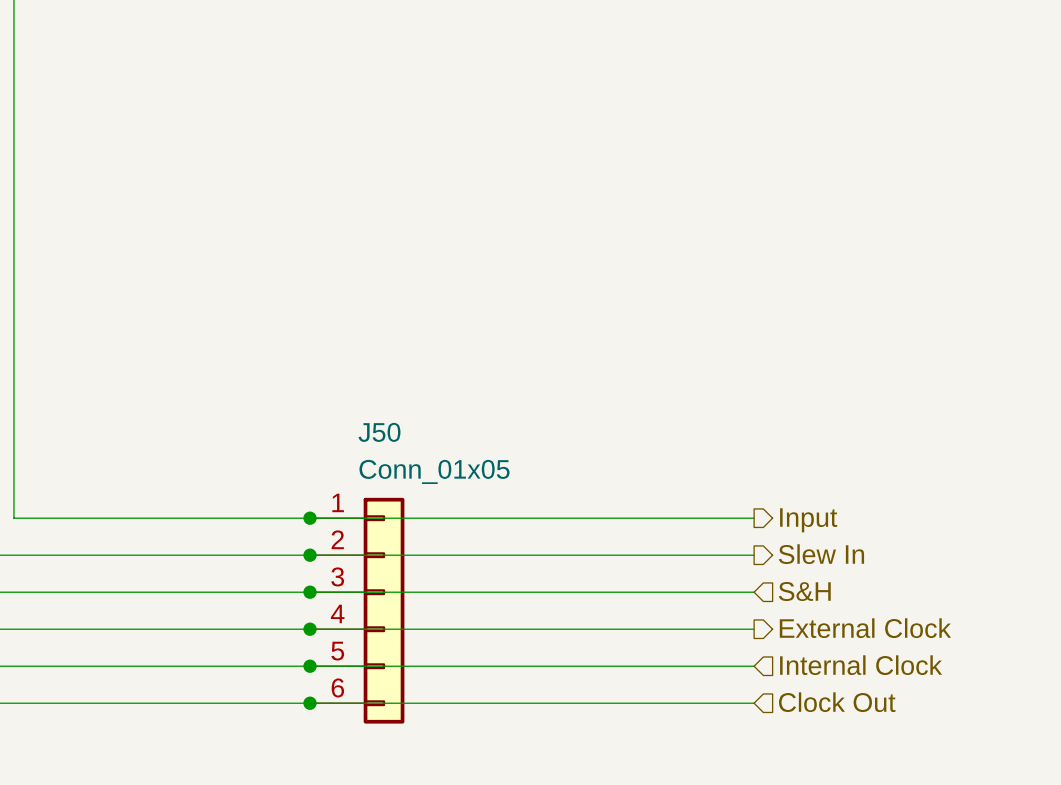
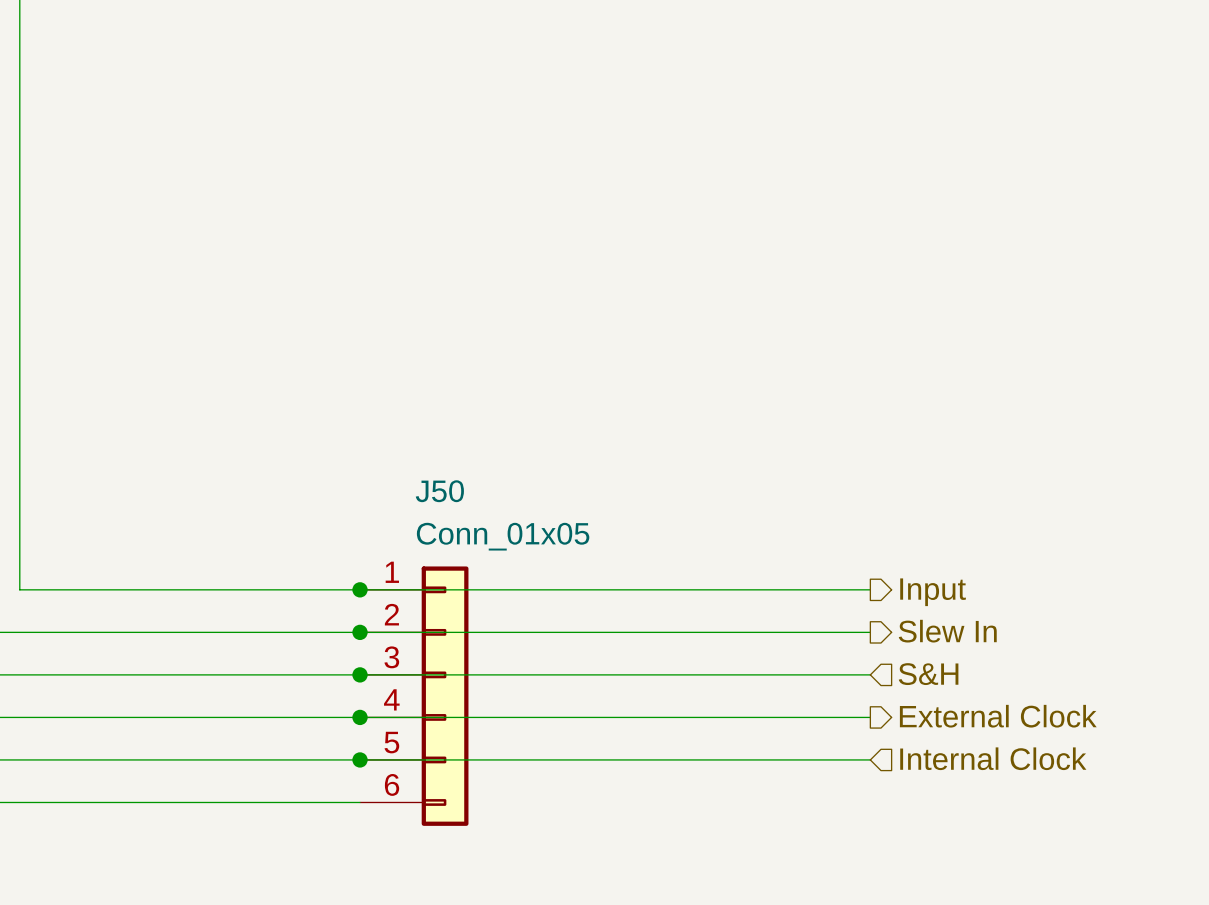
hierarchical label: Clock Out (837, 702) -> none
wire: (310, 703) (754, 703) -> none
junction: (310, 703) -> none

